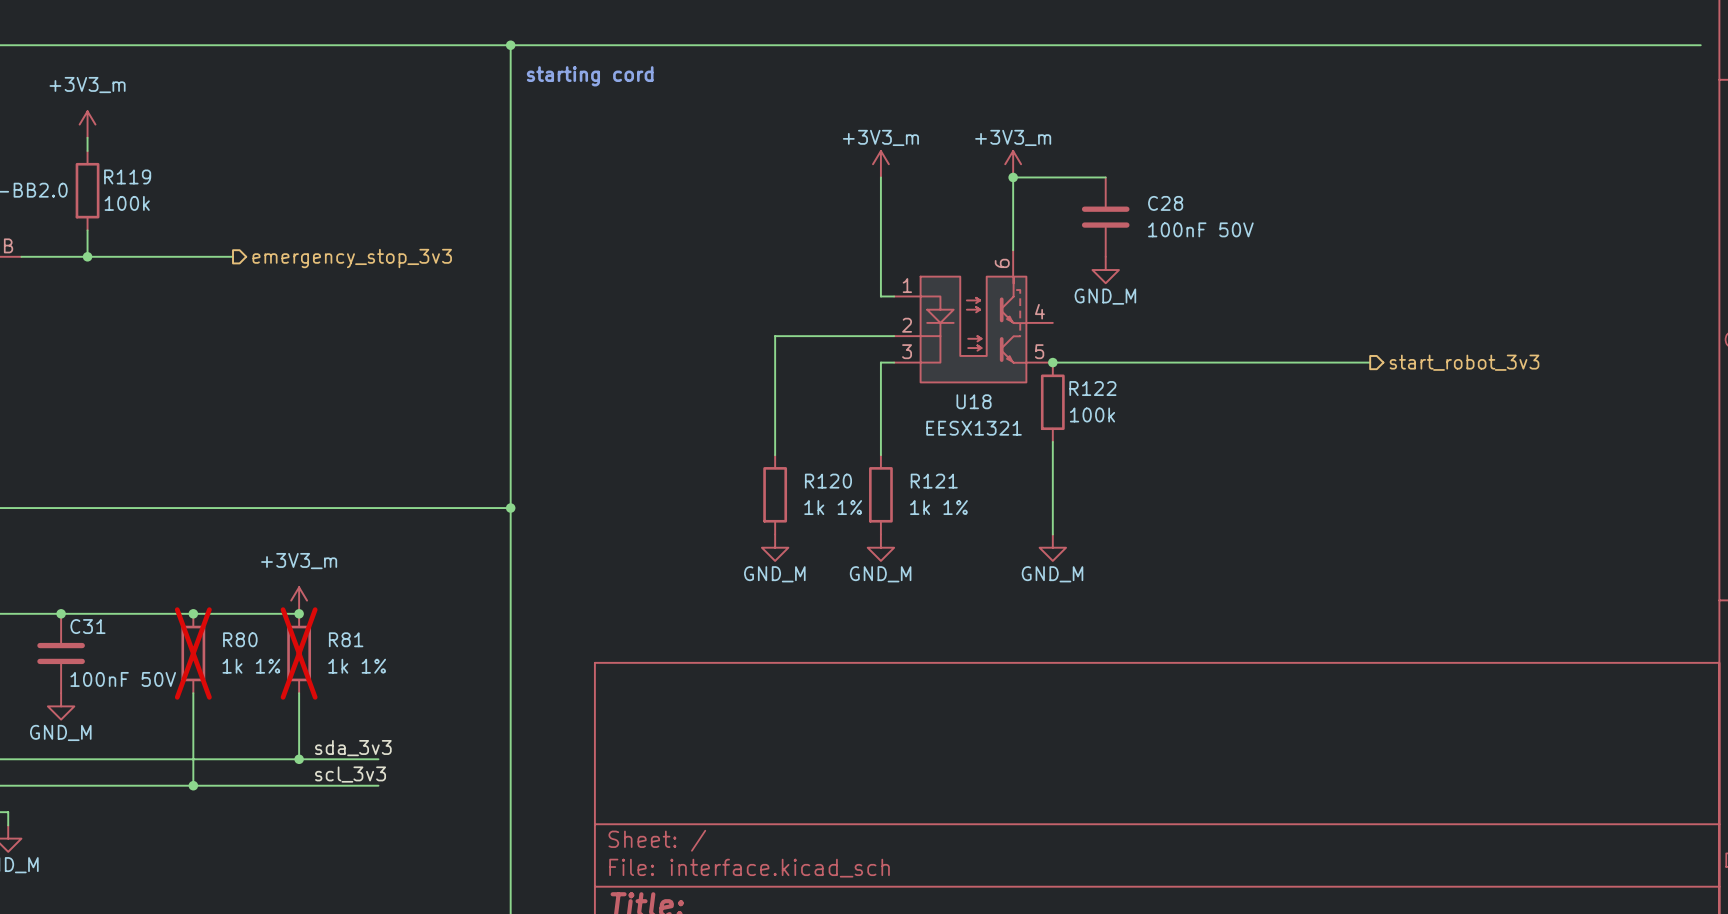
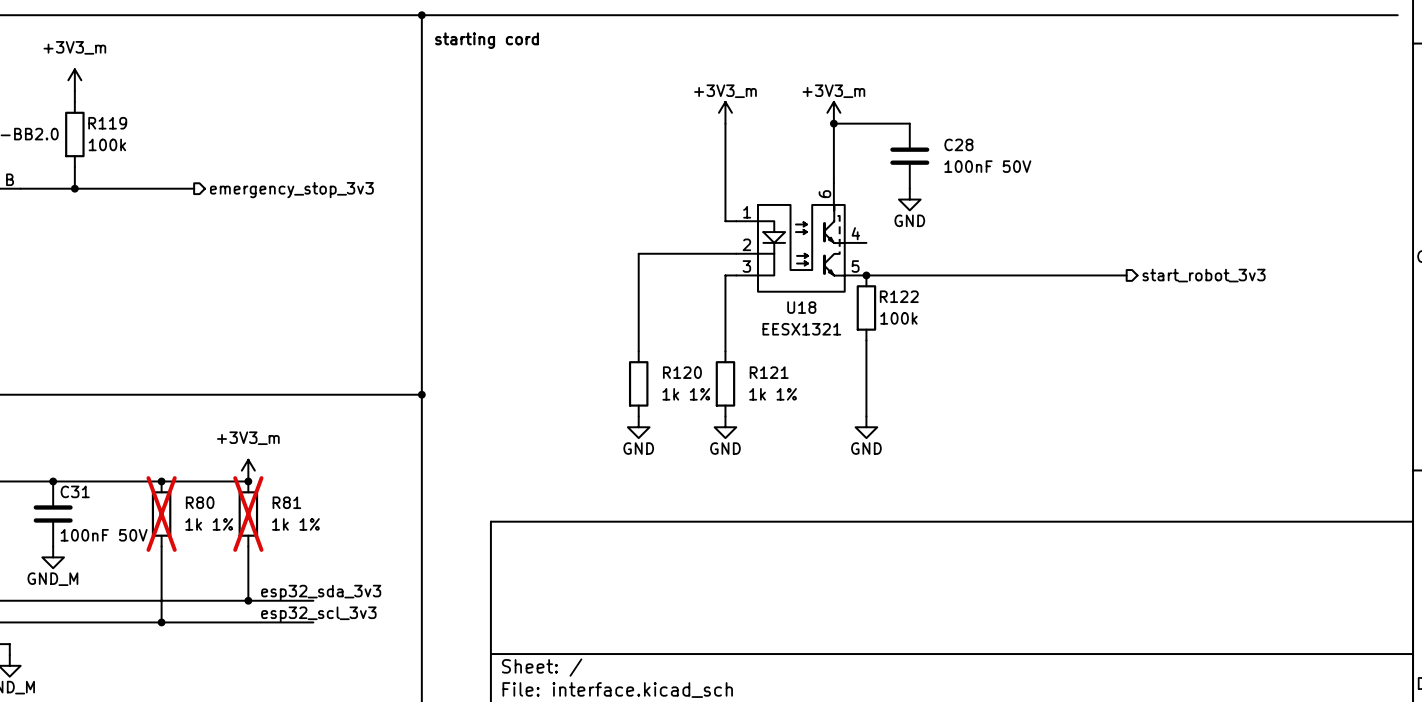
power symbol: GND_M (1105, 270) -> GND (909, 199)
power symbol: GND_M (775, 547) -> GND (638, 427)
power symbol: GND_M (880, 547) -> GND (725, 427)
power symbol: GND_M (1052, 547) -> GND (866, 427)
label: sda_3v3 (353, 748) -> esp32_sda_3v3 (321, 592)
label: scl_3v3 (350, 774) -> esp32_scl_3v3 (318, 614)

